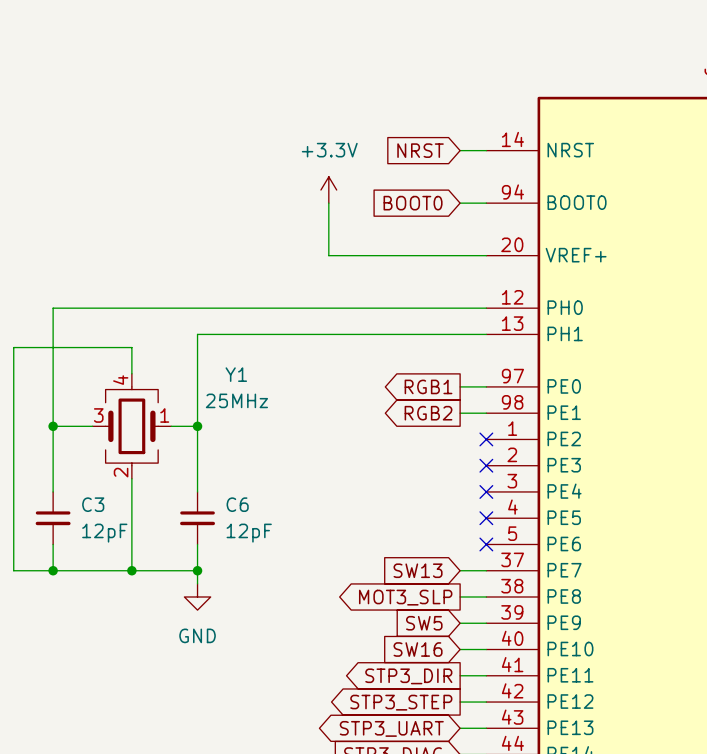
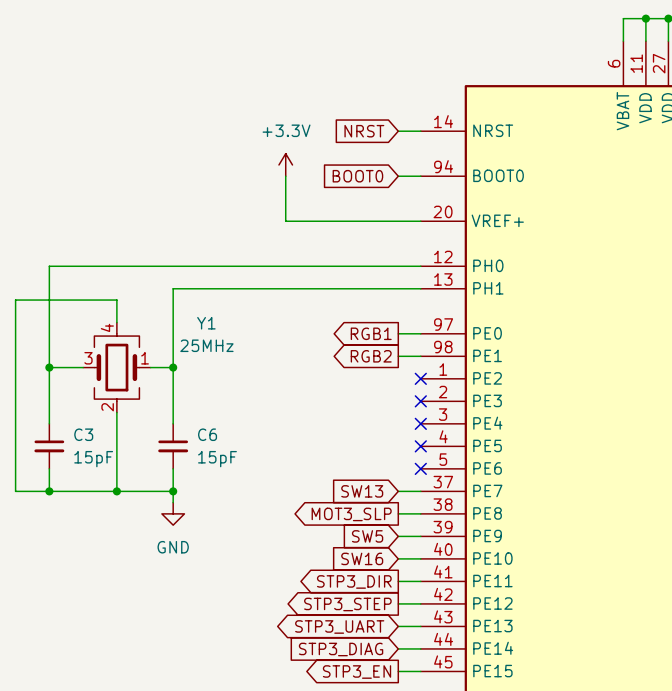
C3 value: 12pF (104, 533) -> 15pF (93, 459)
C6 value: 12pF (249, 533) -> 15pF (217, 459)

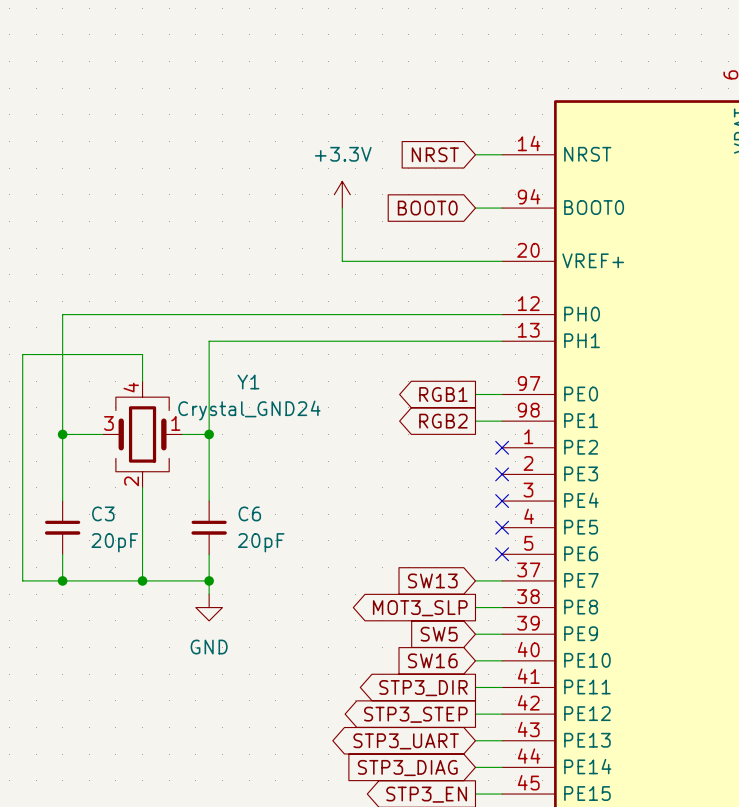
Y1 value: 25MHz (206, 345) -> Crystal_GND24 (249, 410)
C3 value: 15pF (93, 459) -> 20pF (114, 542)
C6 value: 15pF (217, 459) -> 20pF (261, 542)

